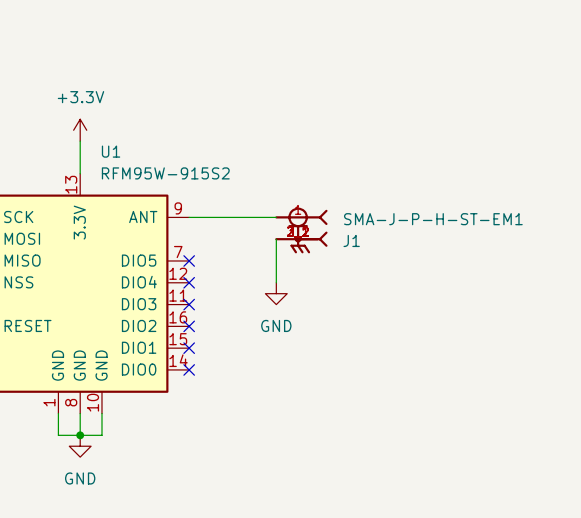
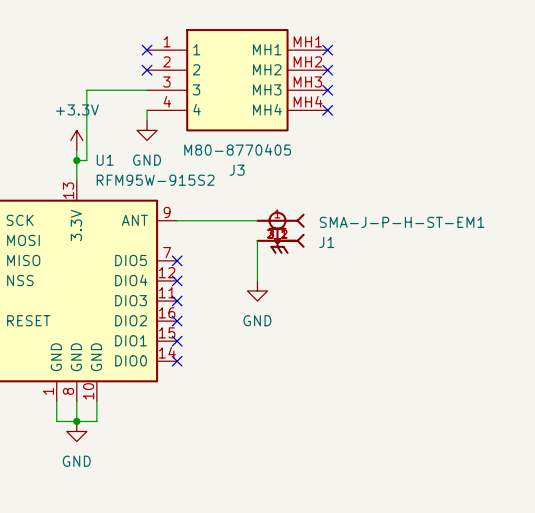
no-connect mark: none -> (147, 50)
no-connect mark: none -> (327, 50)
no-connect mark: none -> (147, 70)
no-connect mark: none -> (327, 70)
J3: none -> M80-8770405 (237, 80)
wire: none -> (147, 90) (86, 90) (86, 160) (76, 160)
no-connect mark: none -> (327, 90)
wire: none -> (147, 110) (147, 120)
no-connect mark: none -> (327, 110)
power symbol: none -> GND (147, 130)
junction: none -> (76, 160)

